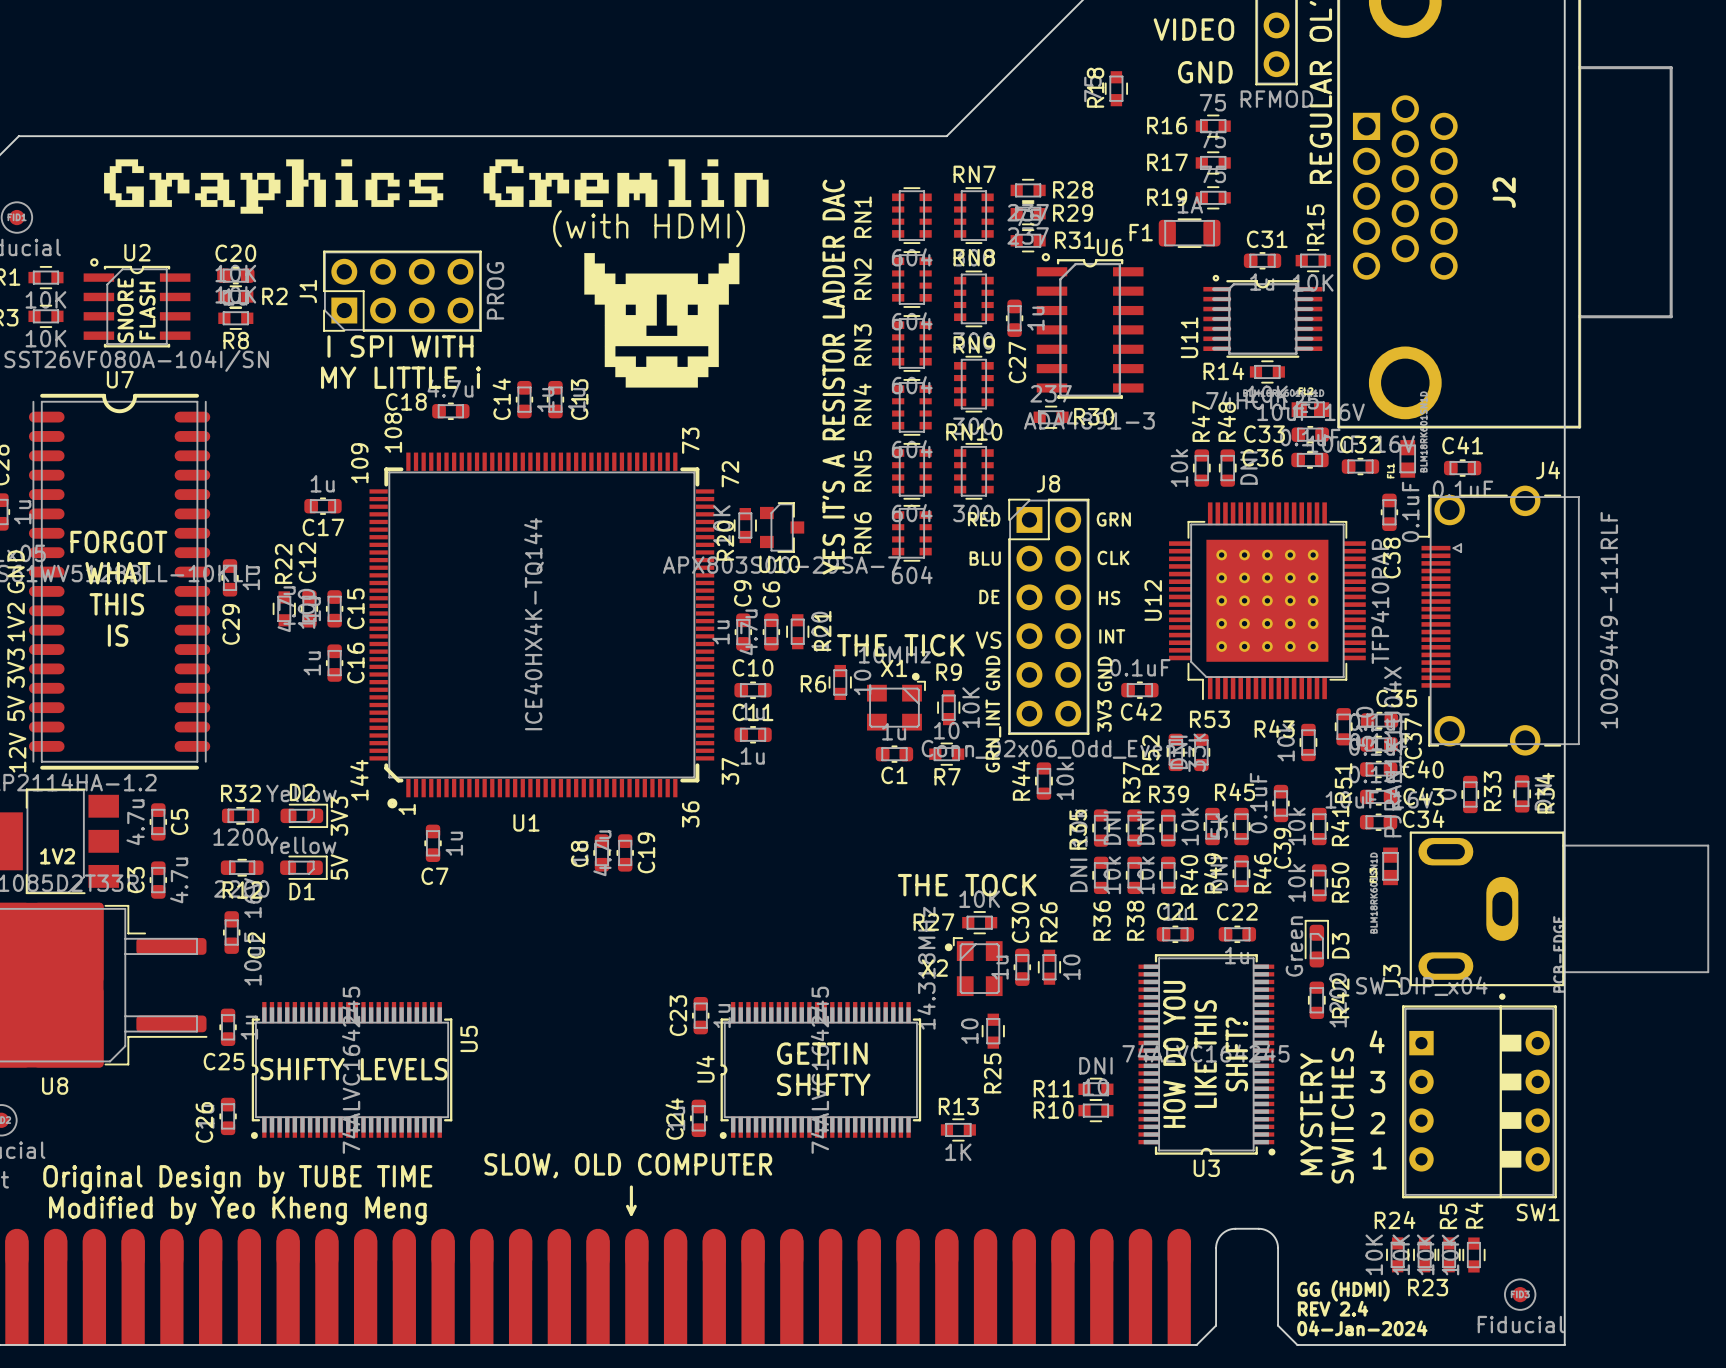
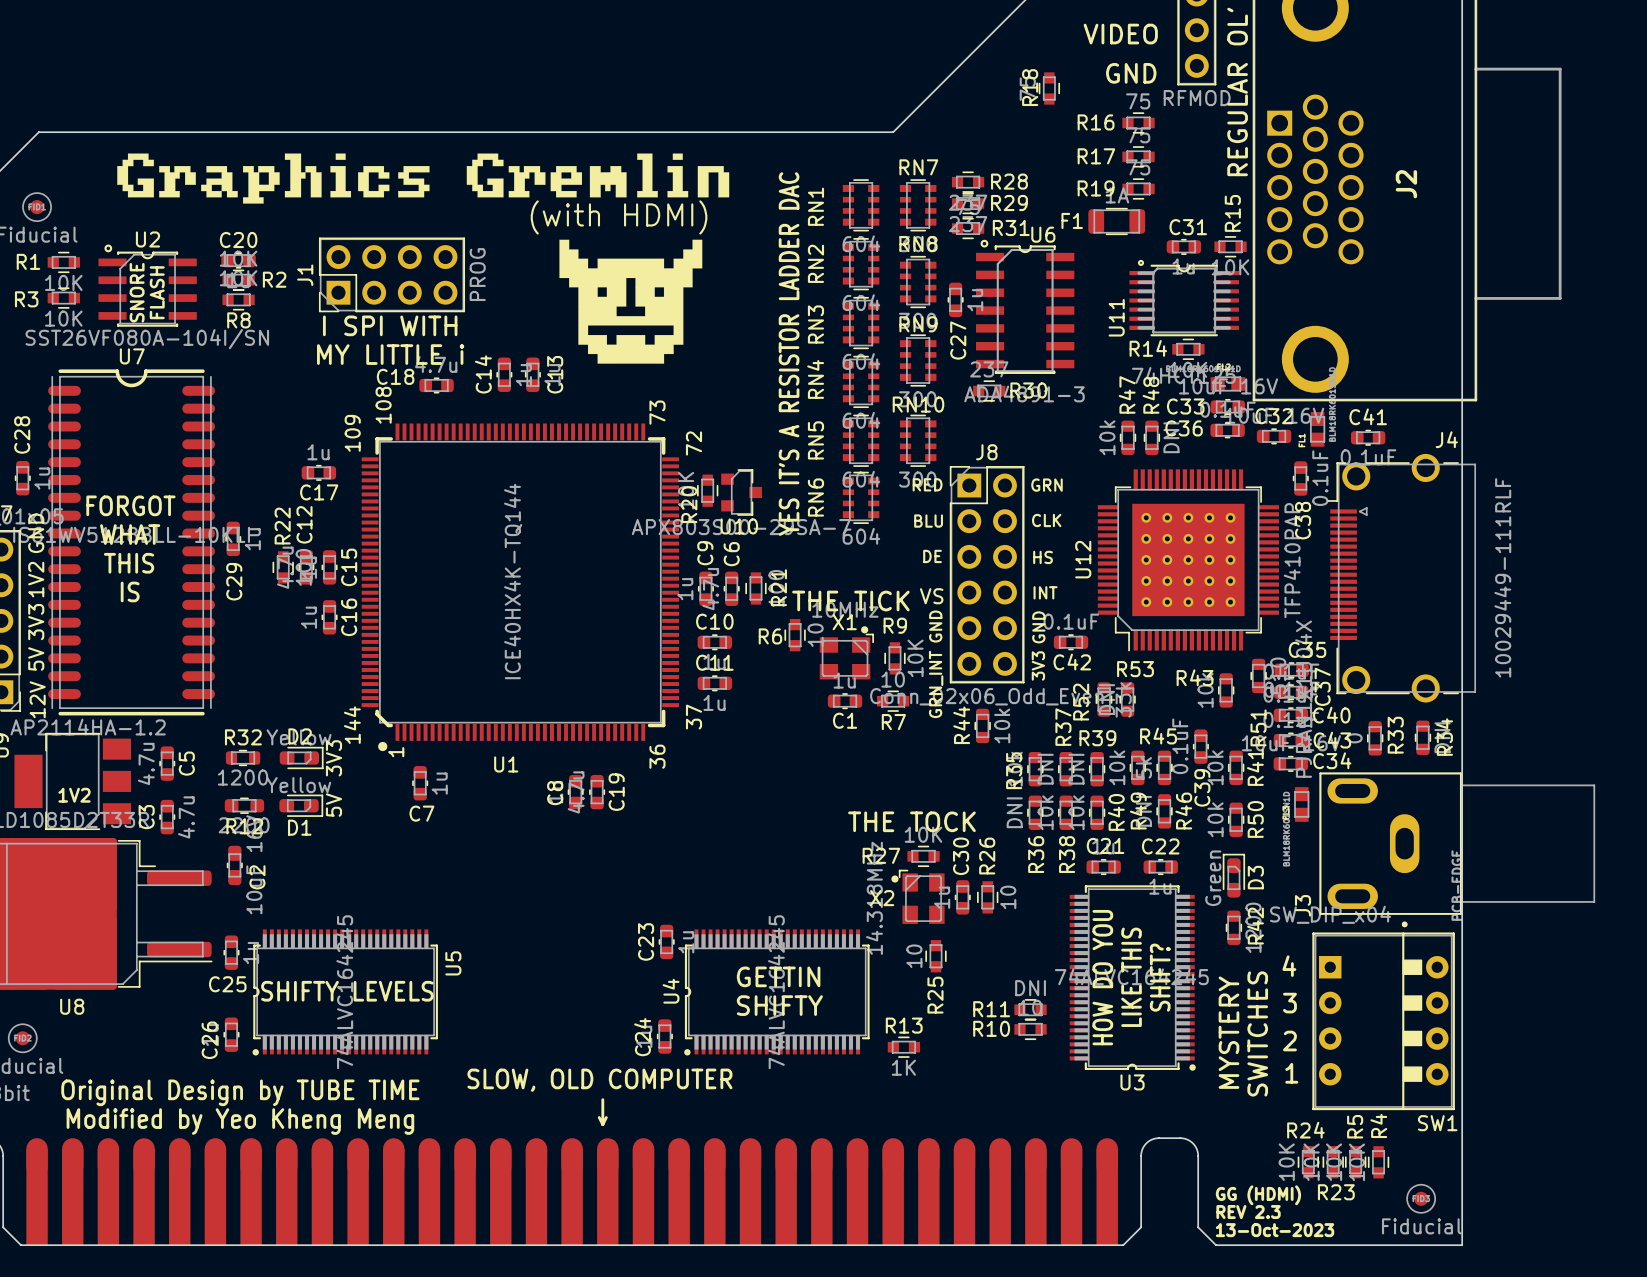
text: REV 2.4 (1333, 1308) -> REV 2.3 (1248, 1212)
text: 04-Jan-2024 (1362, 1328) -> 13-Oct-2023 (1275, 1230)

